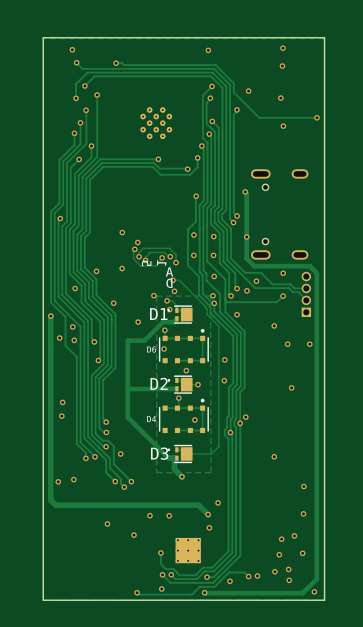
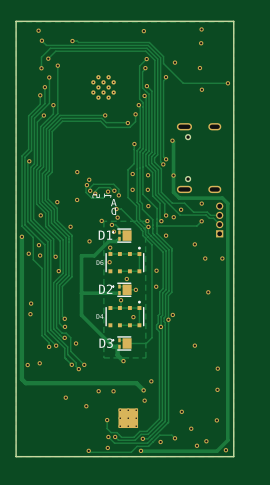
via: (294, 535) -> none
via: (281, 539) -> none
via: none -> (181, 411)
via: (279, 554) -> none
via: none -> (191, 428)
via: (288, 569) -> none
via: (274, 571) -> none
via: (257, 576) -> none
via: none -> (196, 445)

